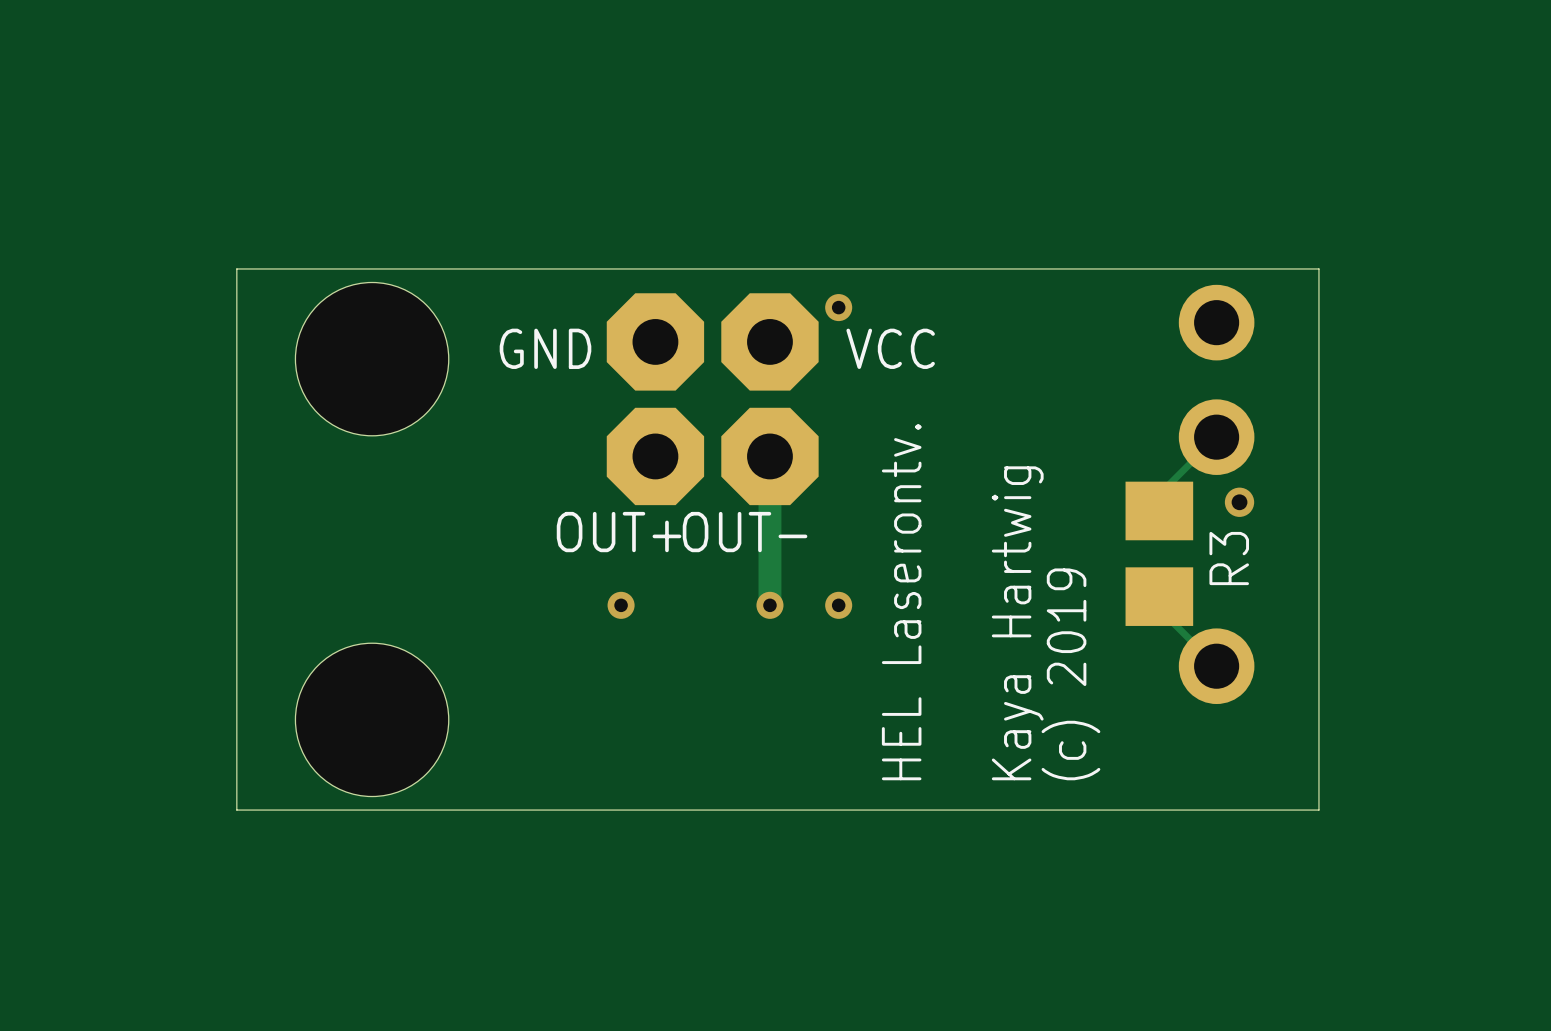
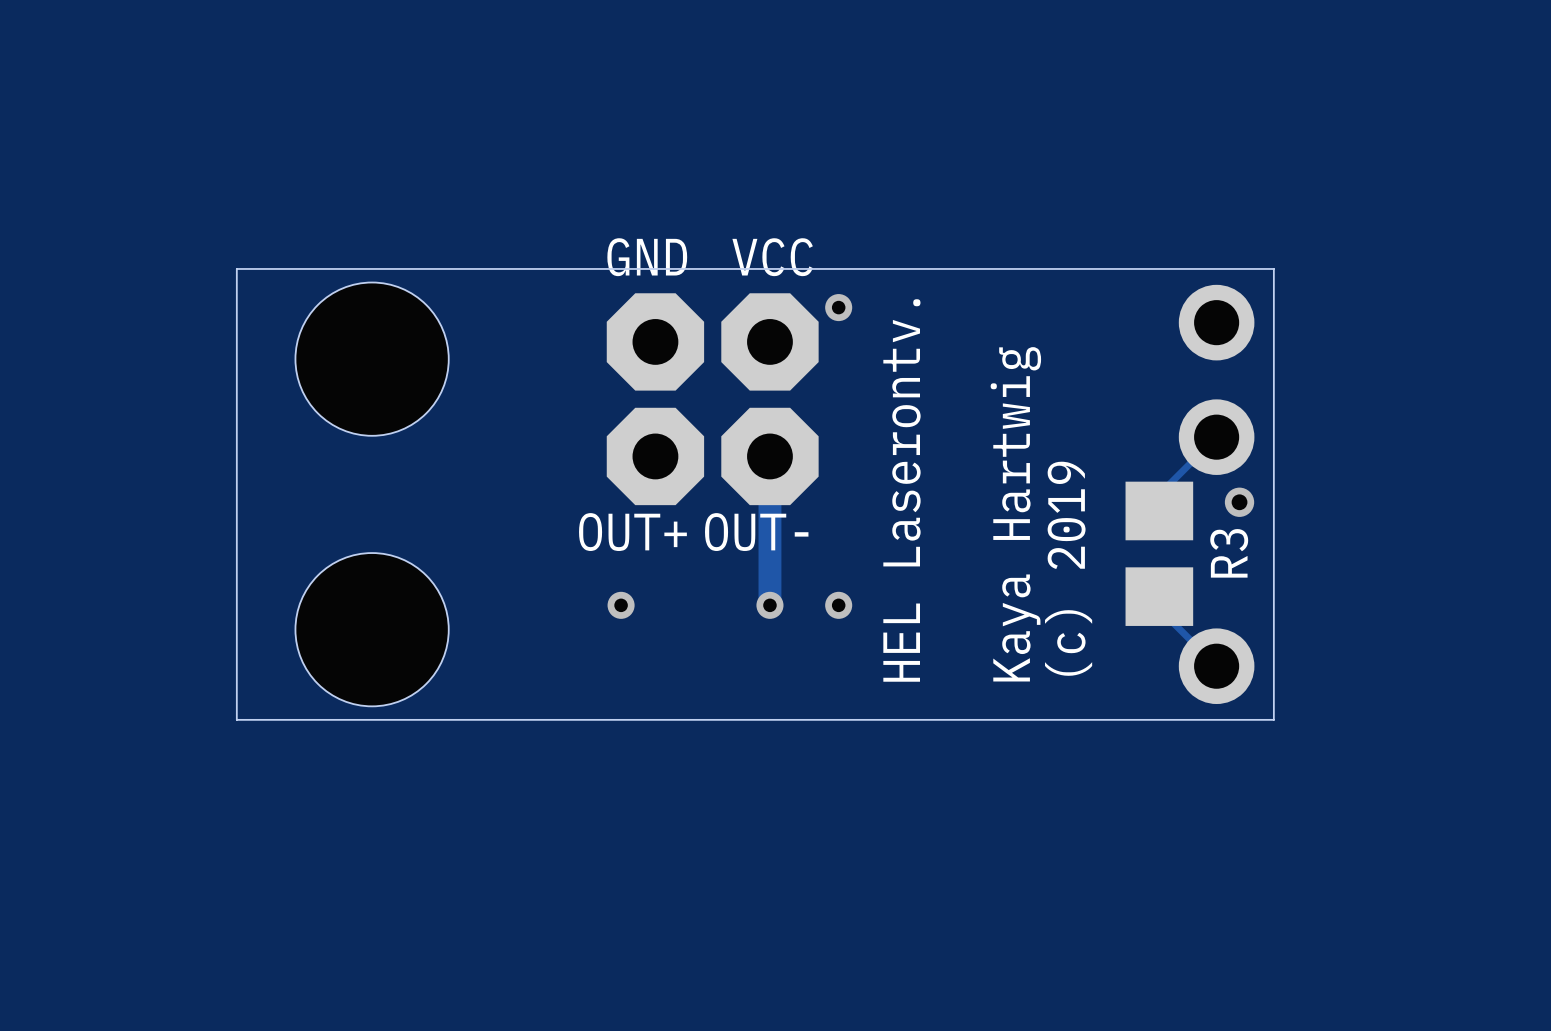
board edge: (1273, 268) (1318, 268) (1318, 810) (236, 810) (236, 719) -> (1273, 268) (1273, 719) (236, 719)
GND name position: GND (545, 348) -> GND (647, 257)
VCC name position: VCC (890, 348) -> VCC (772, 257)
text position: HEL Laserontv. (901, 602) -> HEL Laserontv. (901, 490)
text position: Kaya Hartwig (1017, 623) -> Kaya Hartwig (1015, 514)
text position: (c) 2019 (1070, 674) -> (c) 2019 (1068, 568)
hole position: (372, 719) -> (372, 629)

